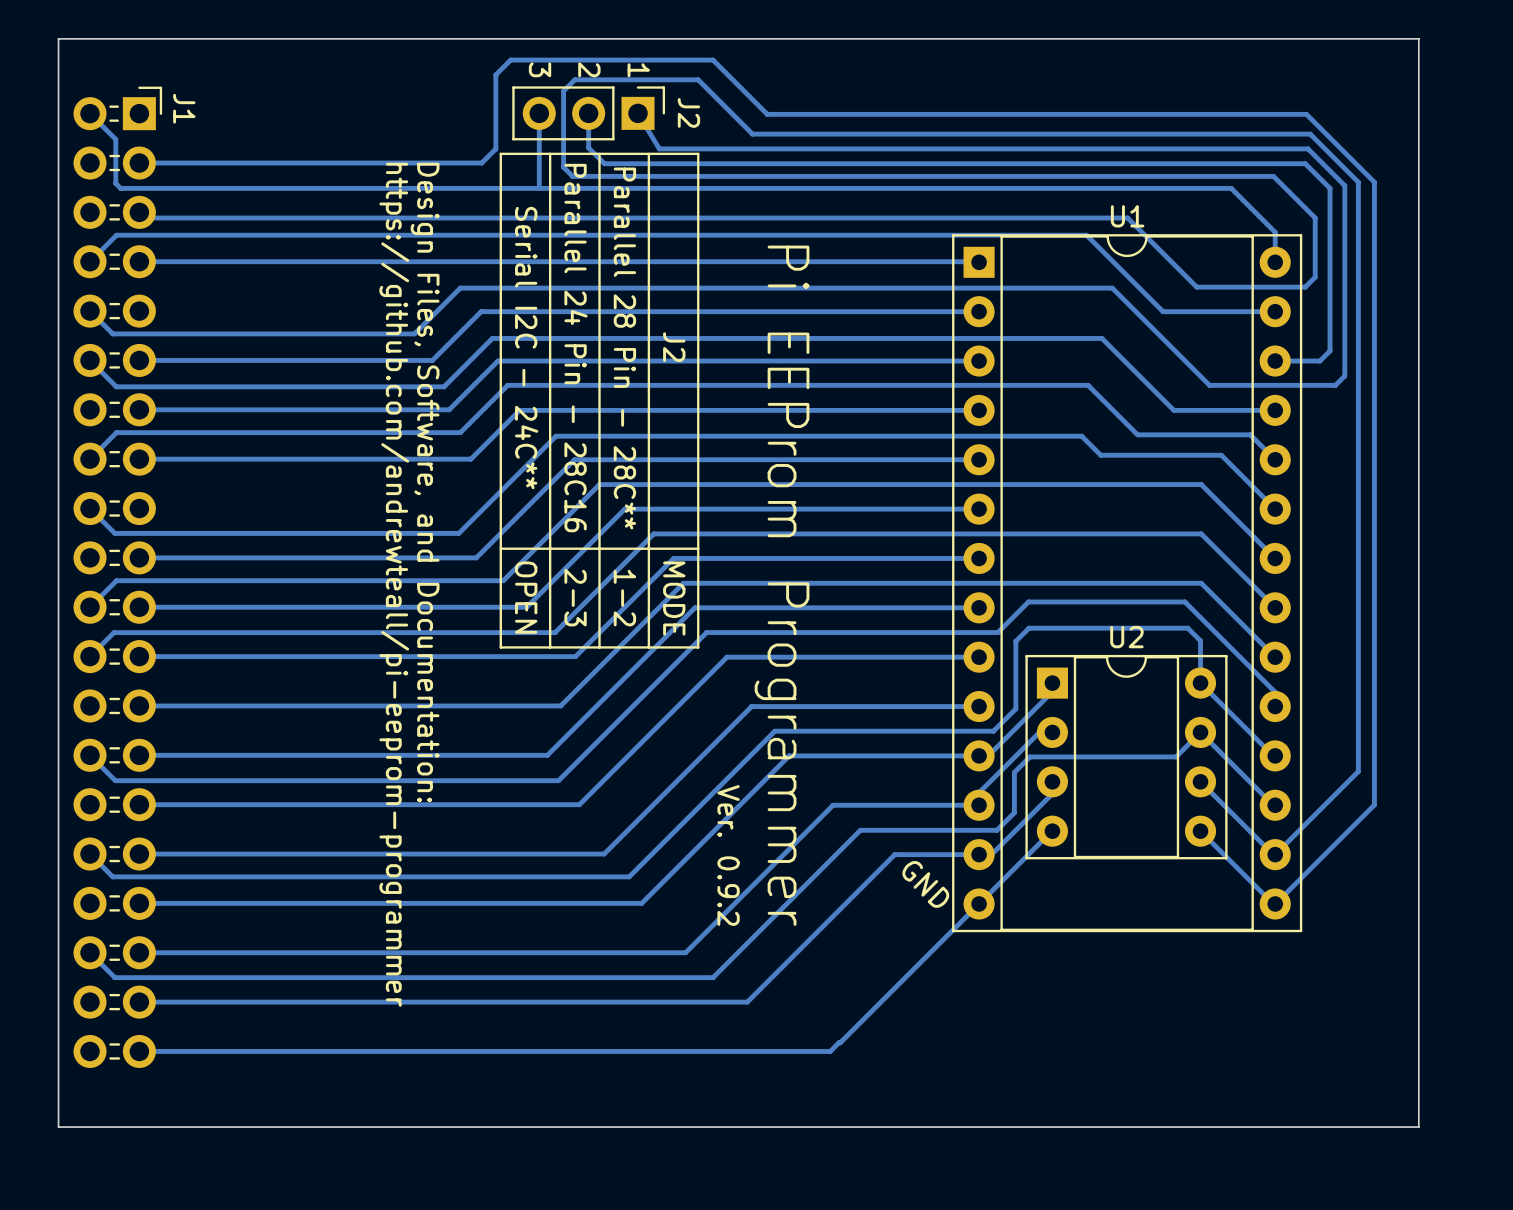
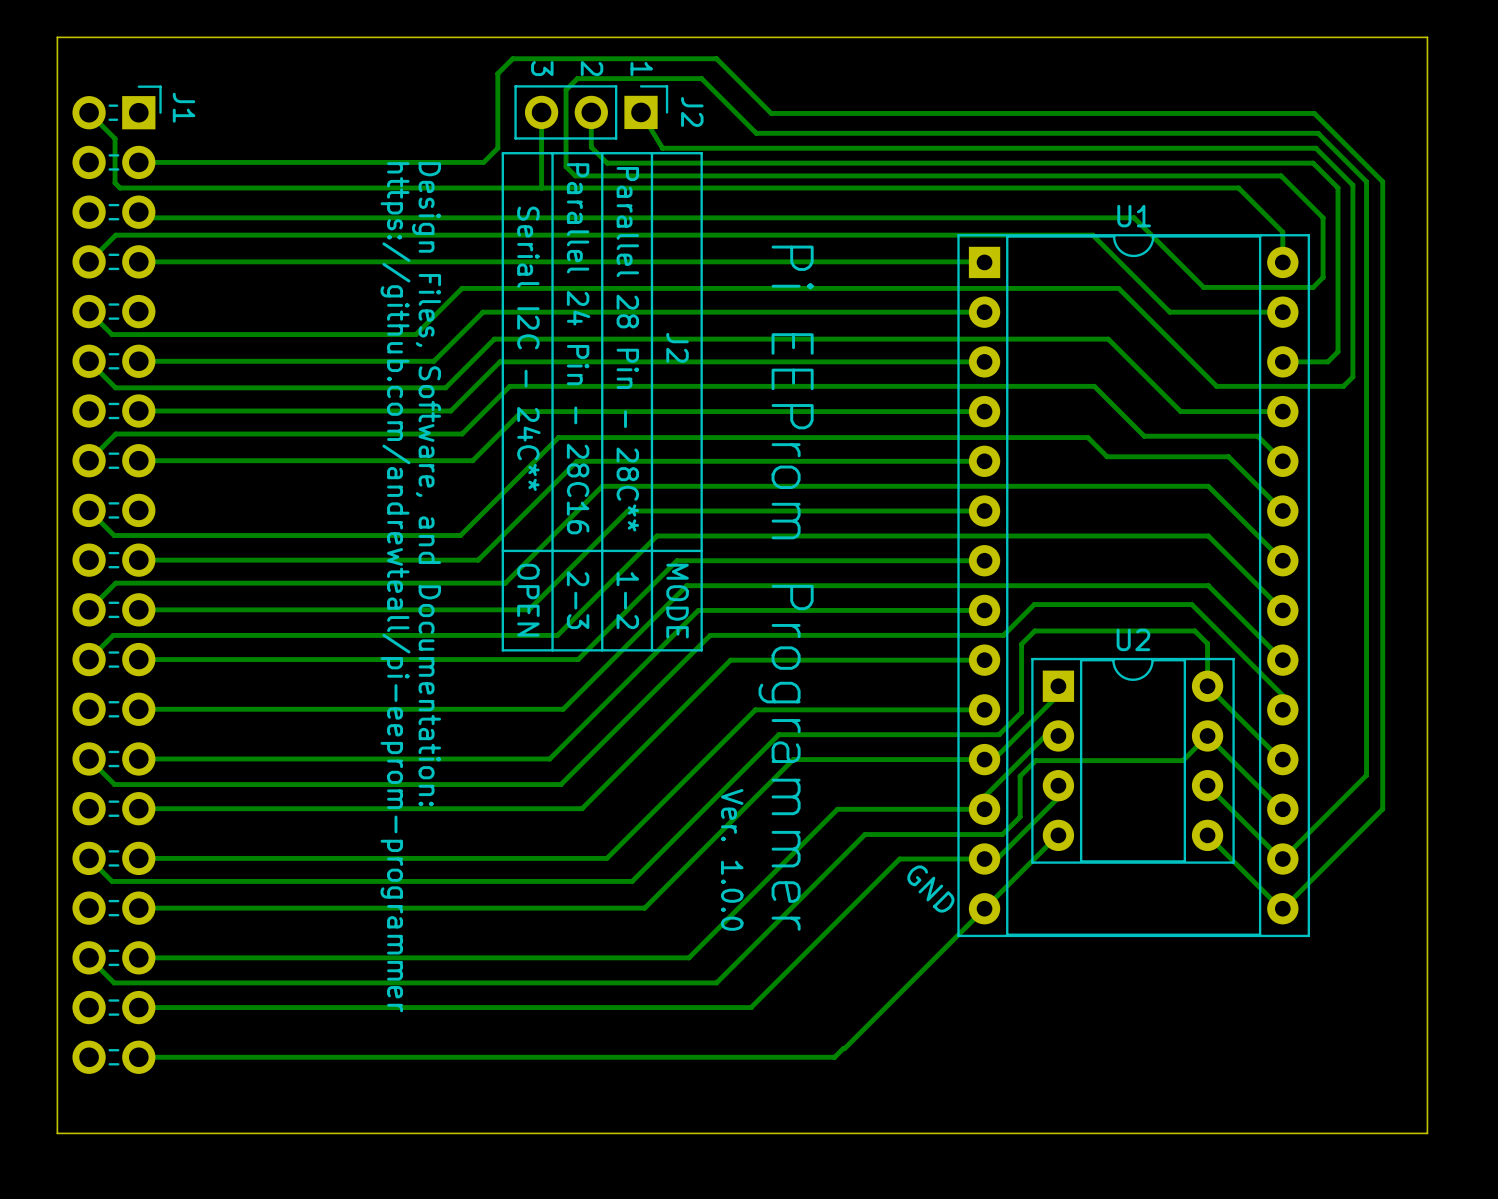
text: Ver. 0.9.2 (728, 855) -> Ver. 1.0.0 (732, 859)

